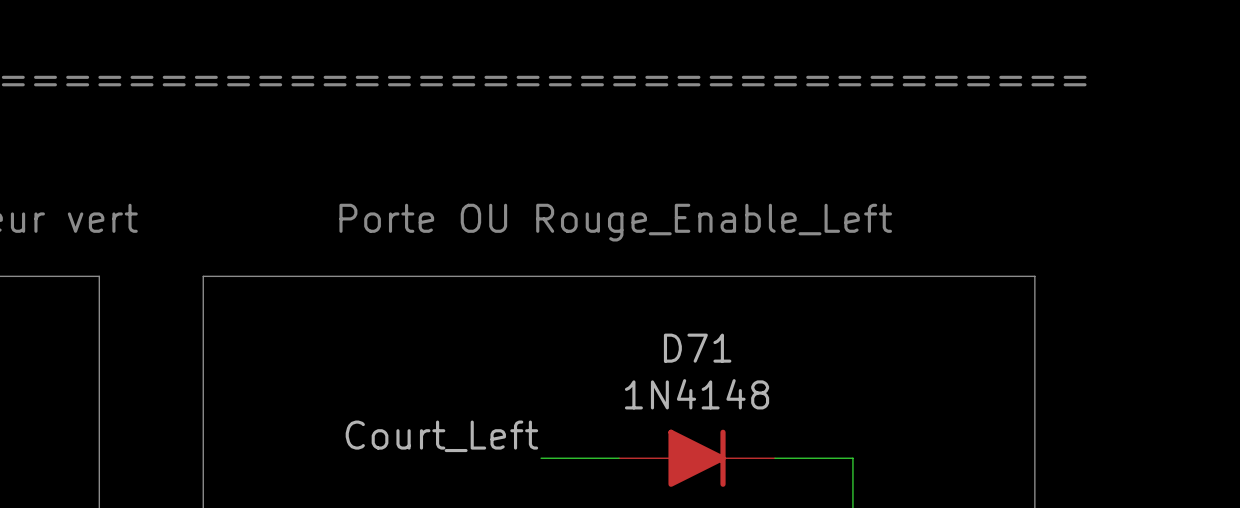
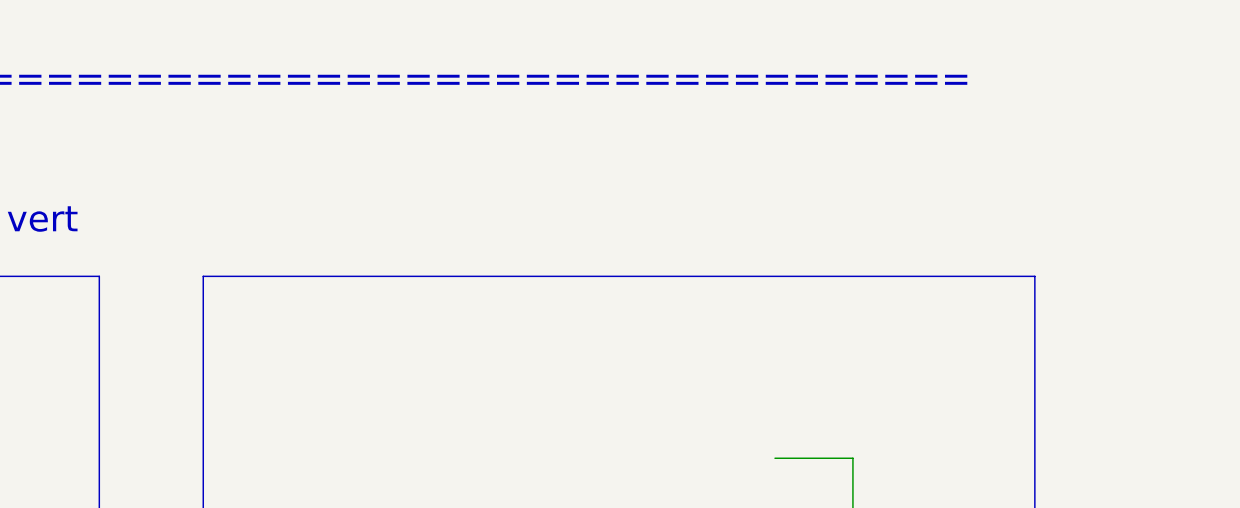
text: Porte OU Rouge_Enable_Left (615, 222) -> none
label: Court_Left (441, 436) -> none
wire: (541, 458) (619, 458) -> none
D71: 1N4148 (697, 458) -> none

